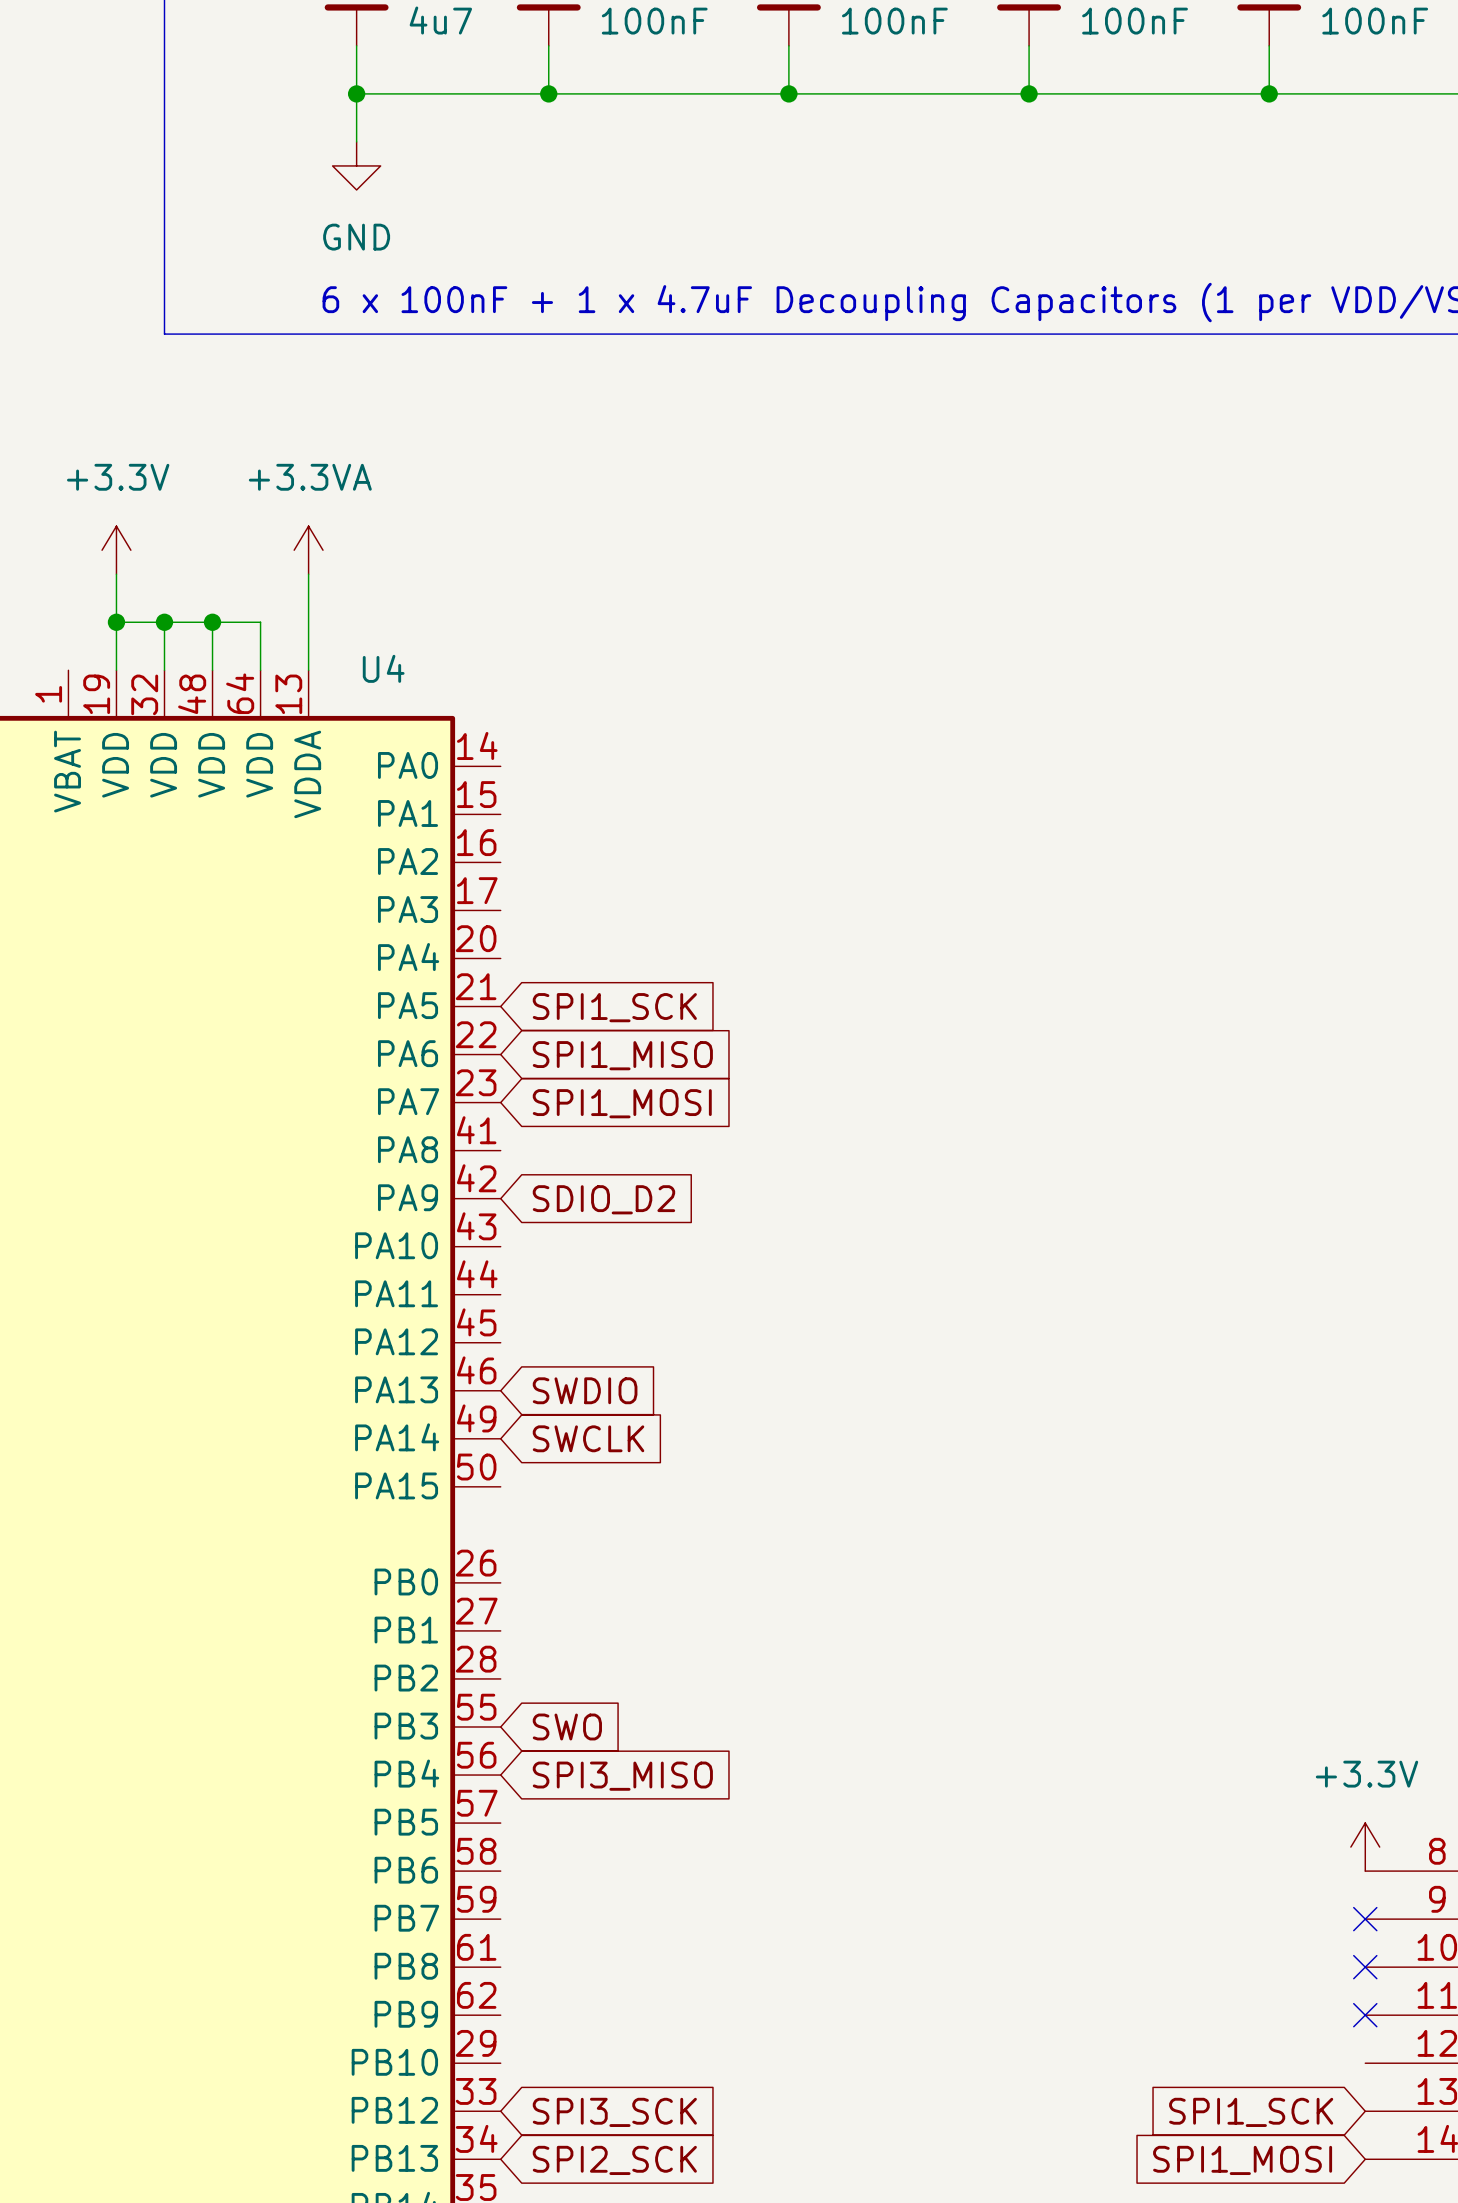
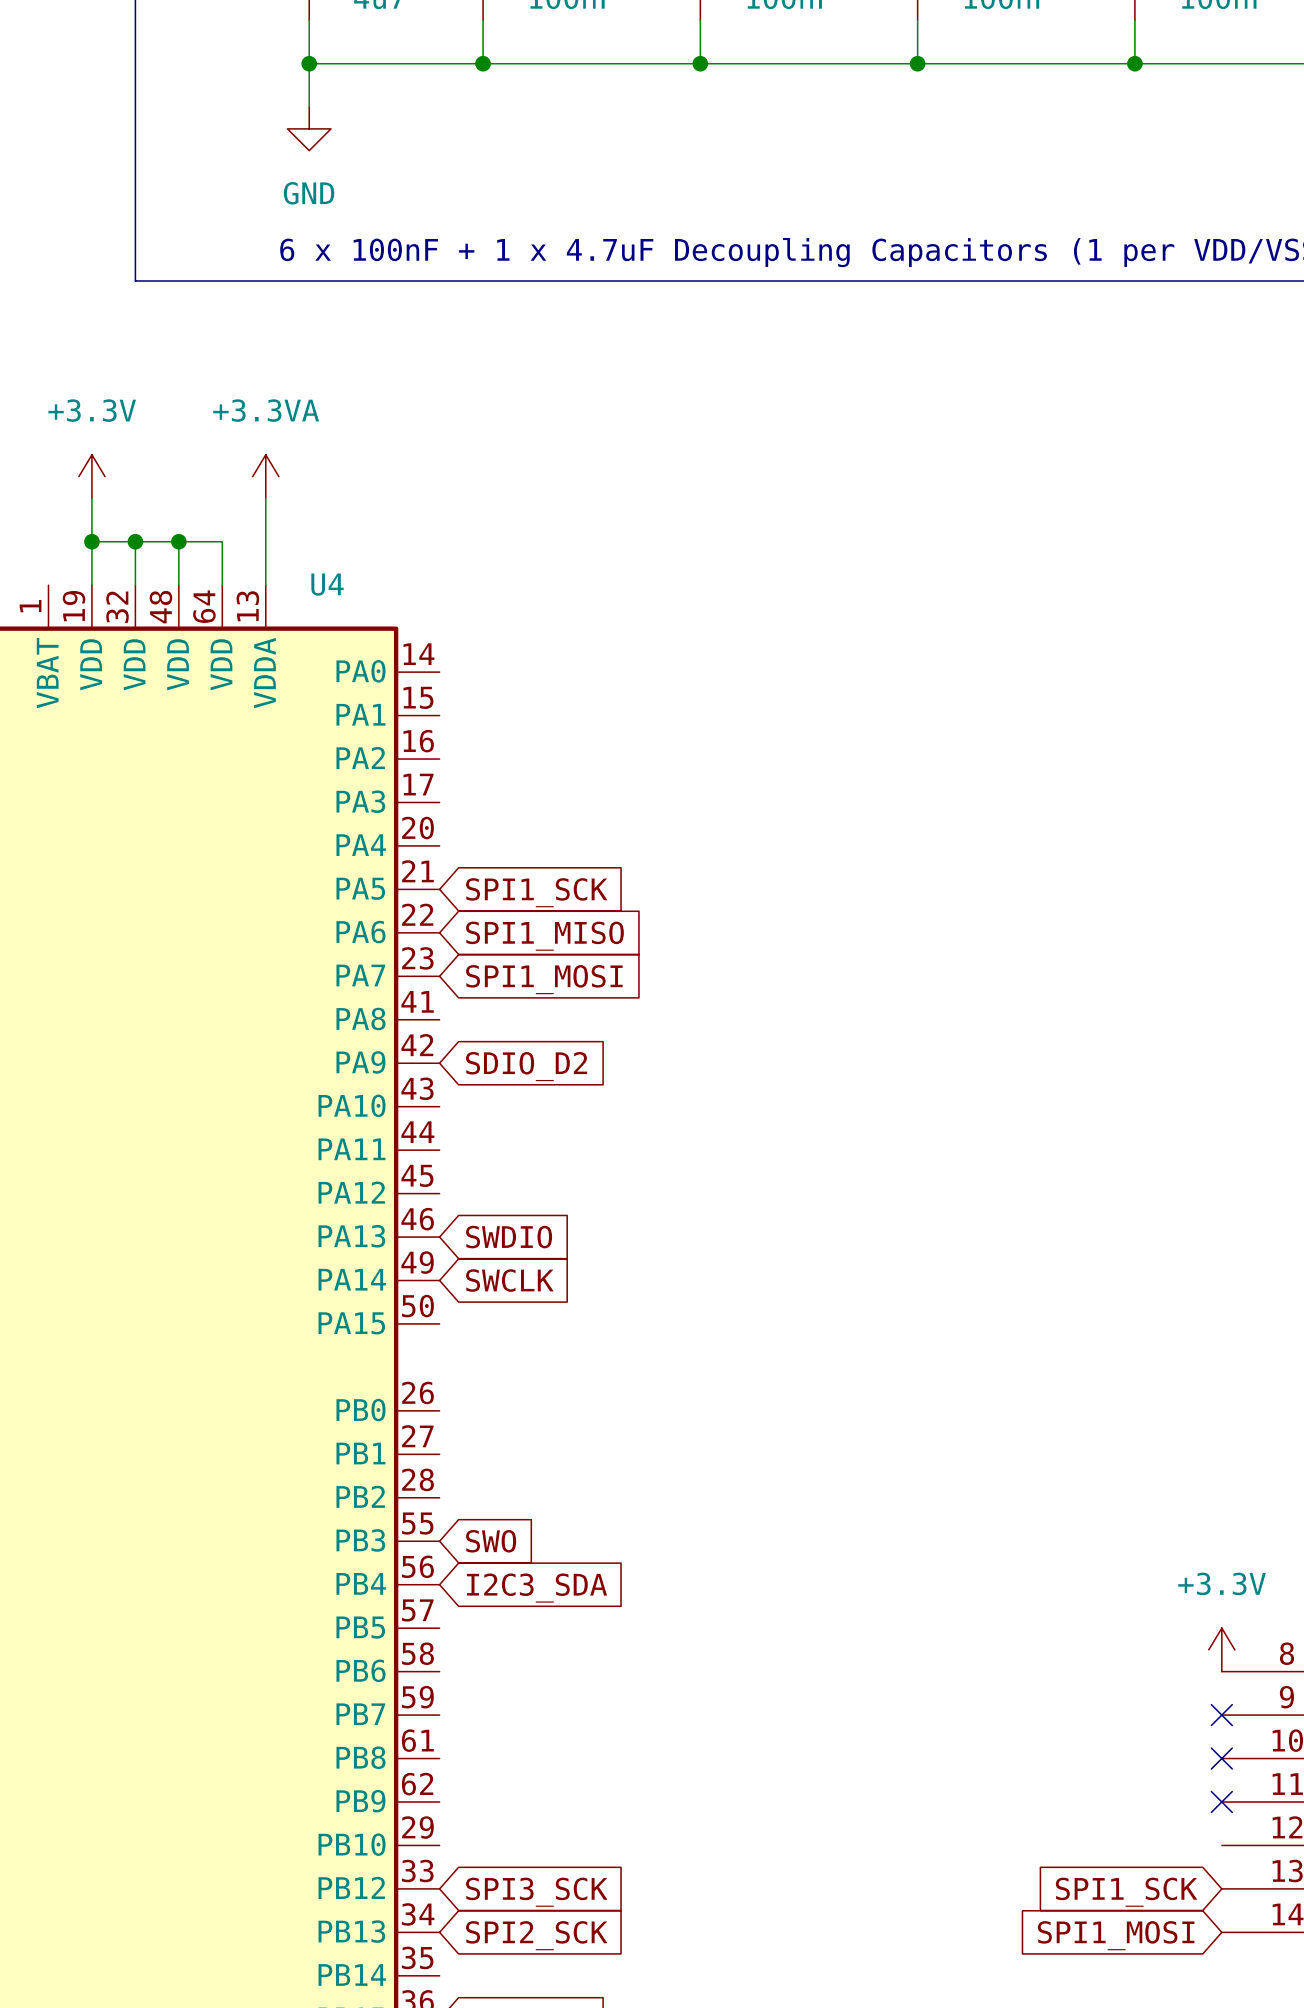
global label: SPI3_MISO (622, 1776) -> I2C3_SDA (537, 1588)

